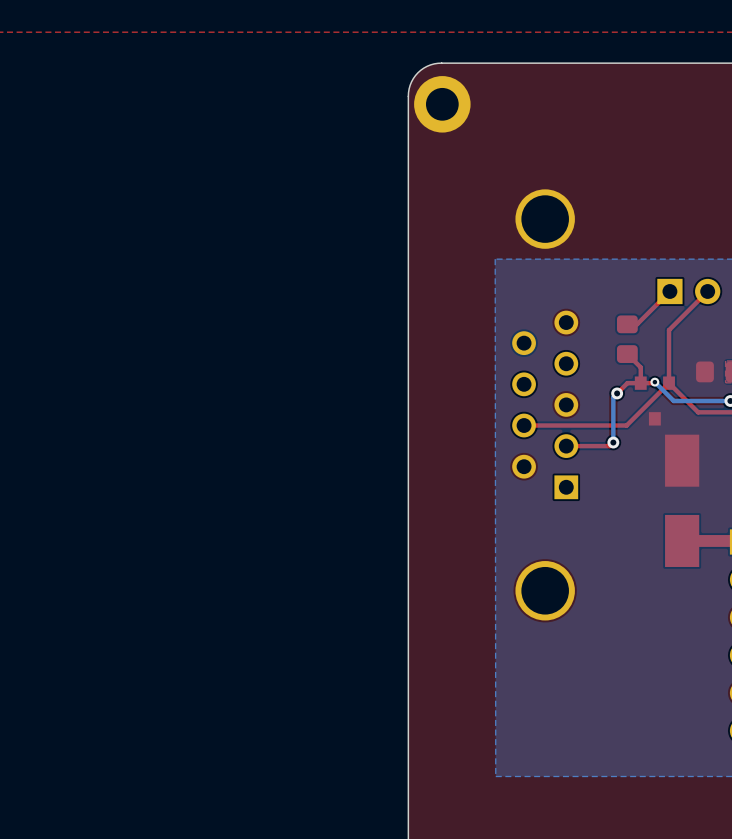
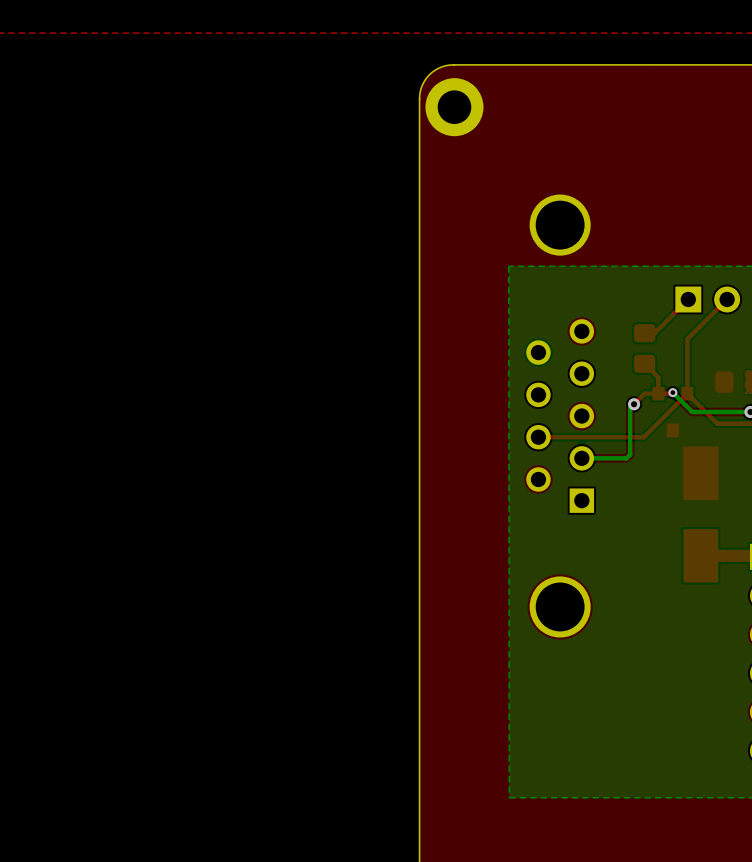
top track: (613, 442) (609, 446) (566, 446) -> none
bottom track: none -> (630, 454) (626, 458) (581, 458)
via: (613, 442) -> none

